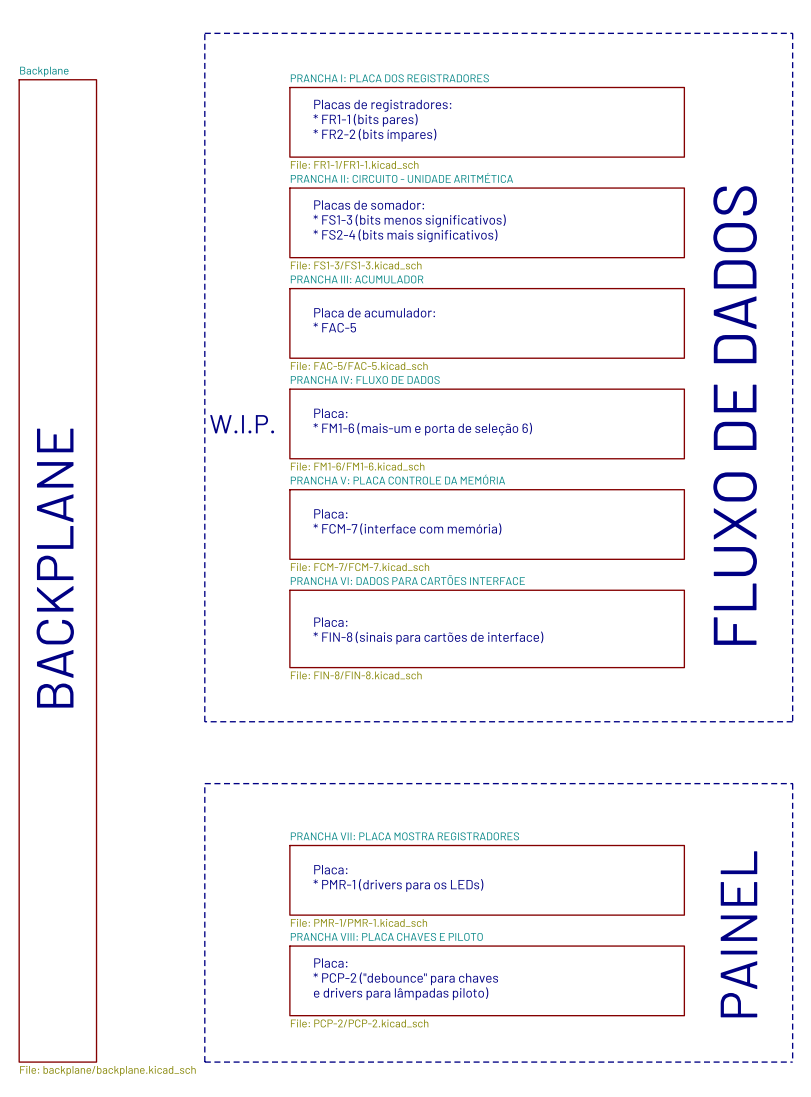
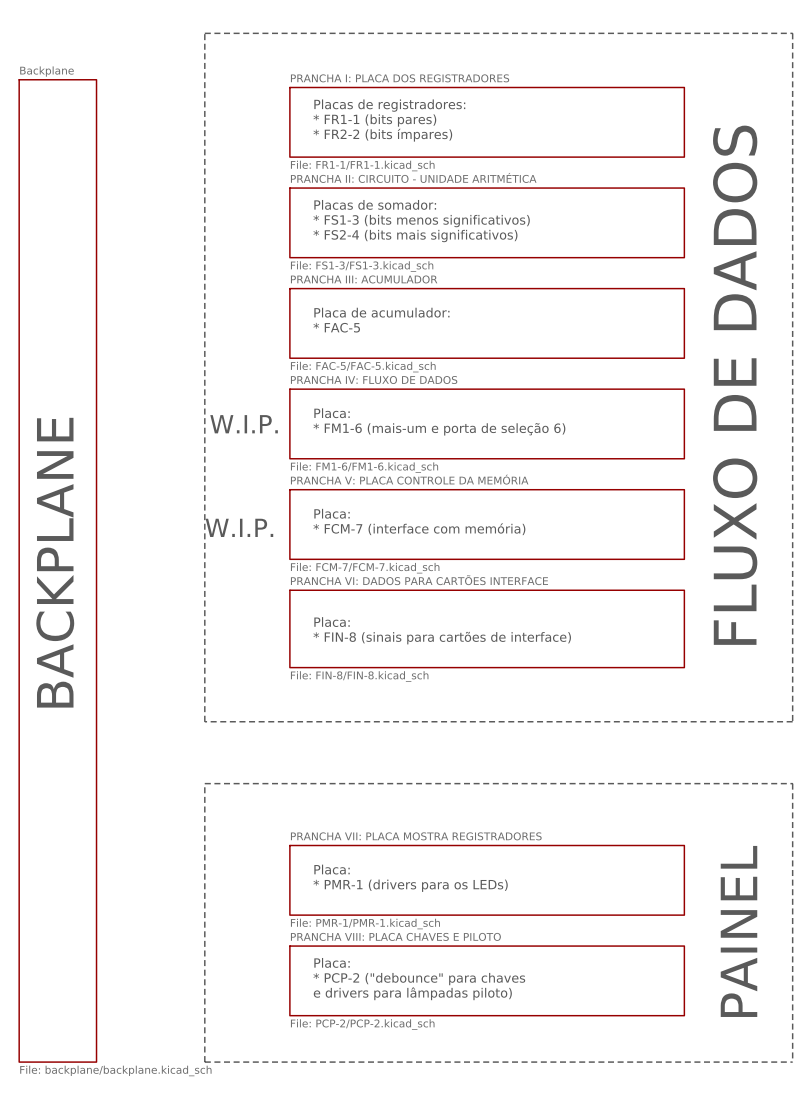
text: none -> W.I.P. (239, 527)

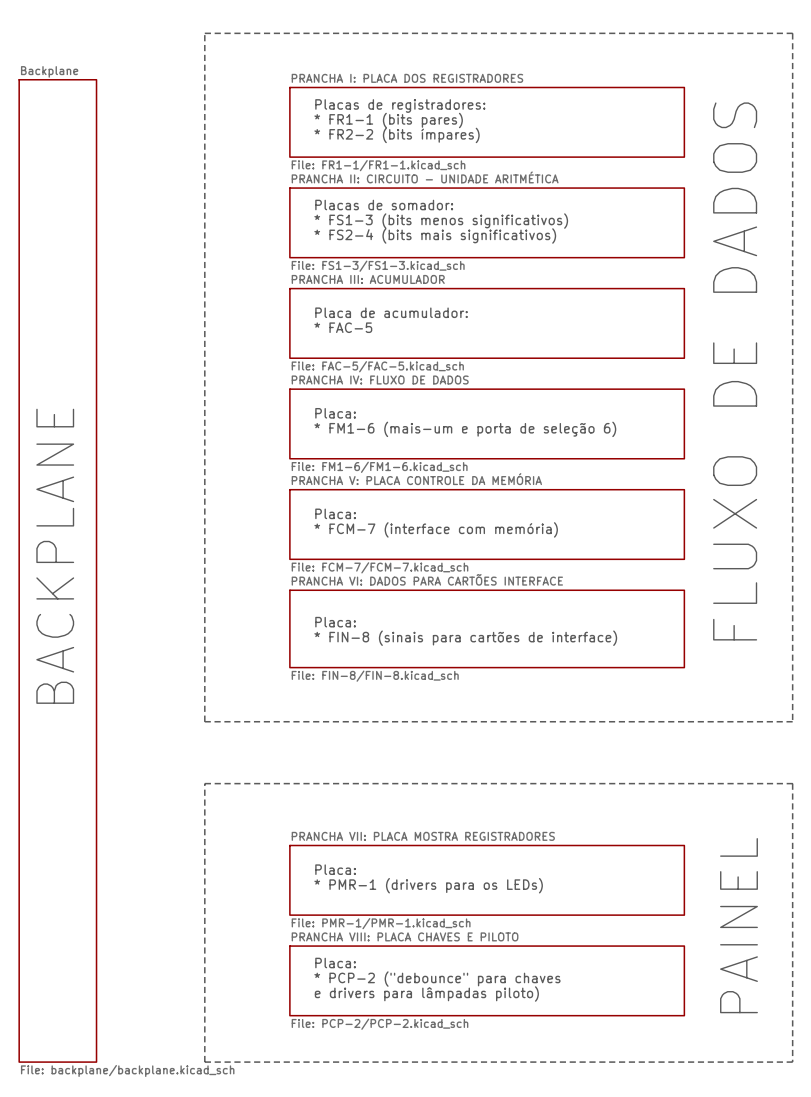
text: W.I.P. (244, 424) -> none
text: W.I.P. (239, 527) -> none

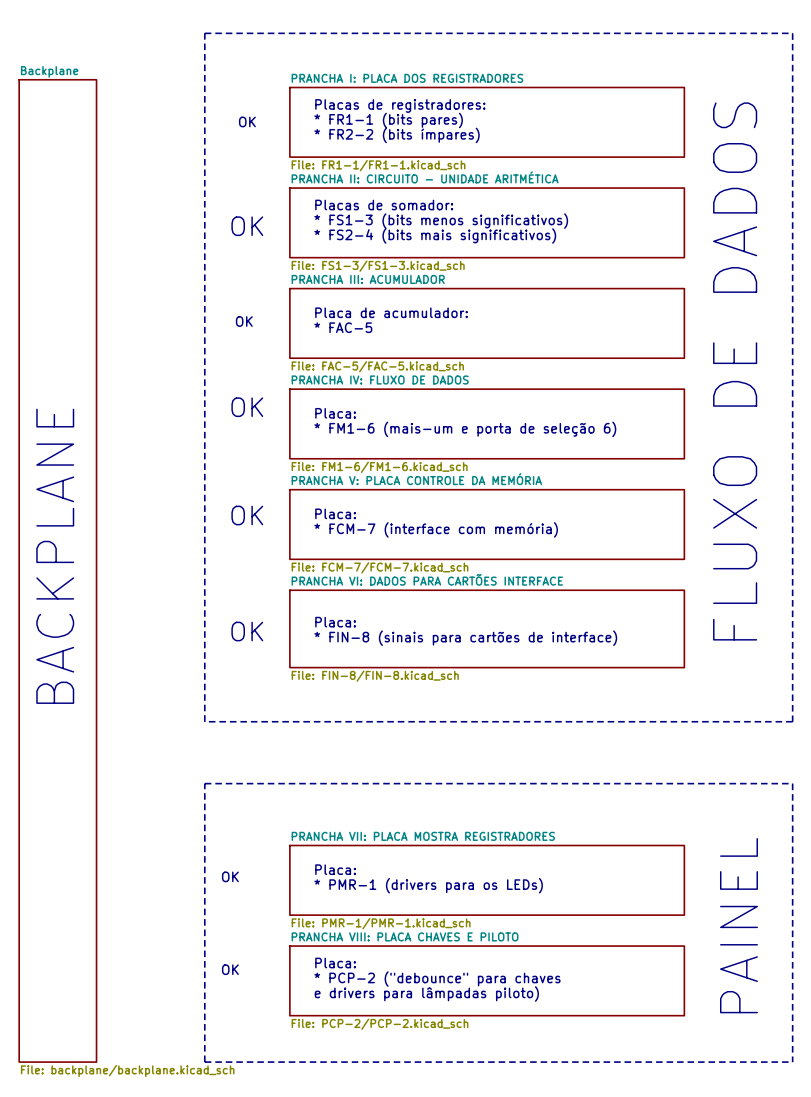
text: none -> OK (247, 121)
text: none -> OK (247, 226)
text: none -> OK (244, 321)
text: none -> OK (247, 407)
text: none -> OK (247, 515)
text: none -> OK (247, 631)
text: none -> OK (230, 876)
text: none -> OK (230, 969)

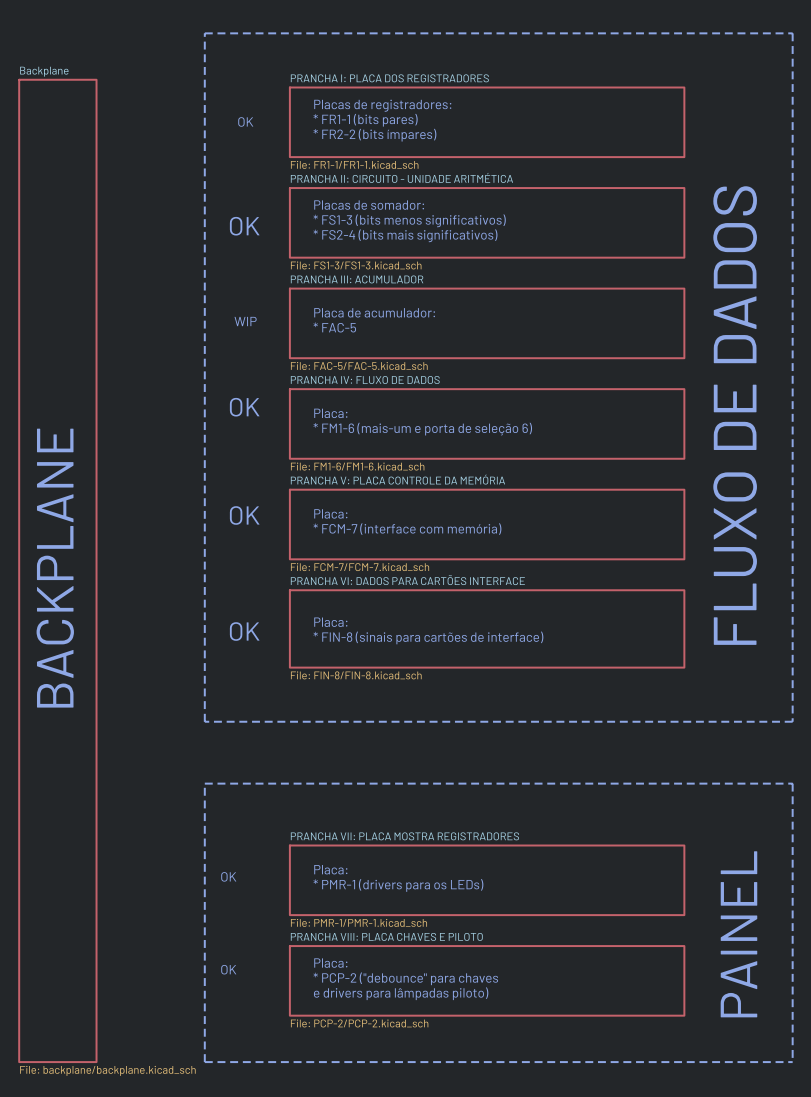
text: OK (244, 321) -> WIP (245, 321)

